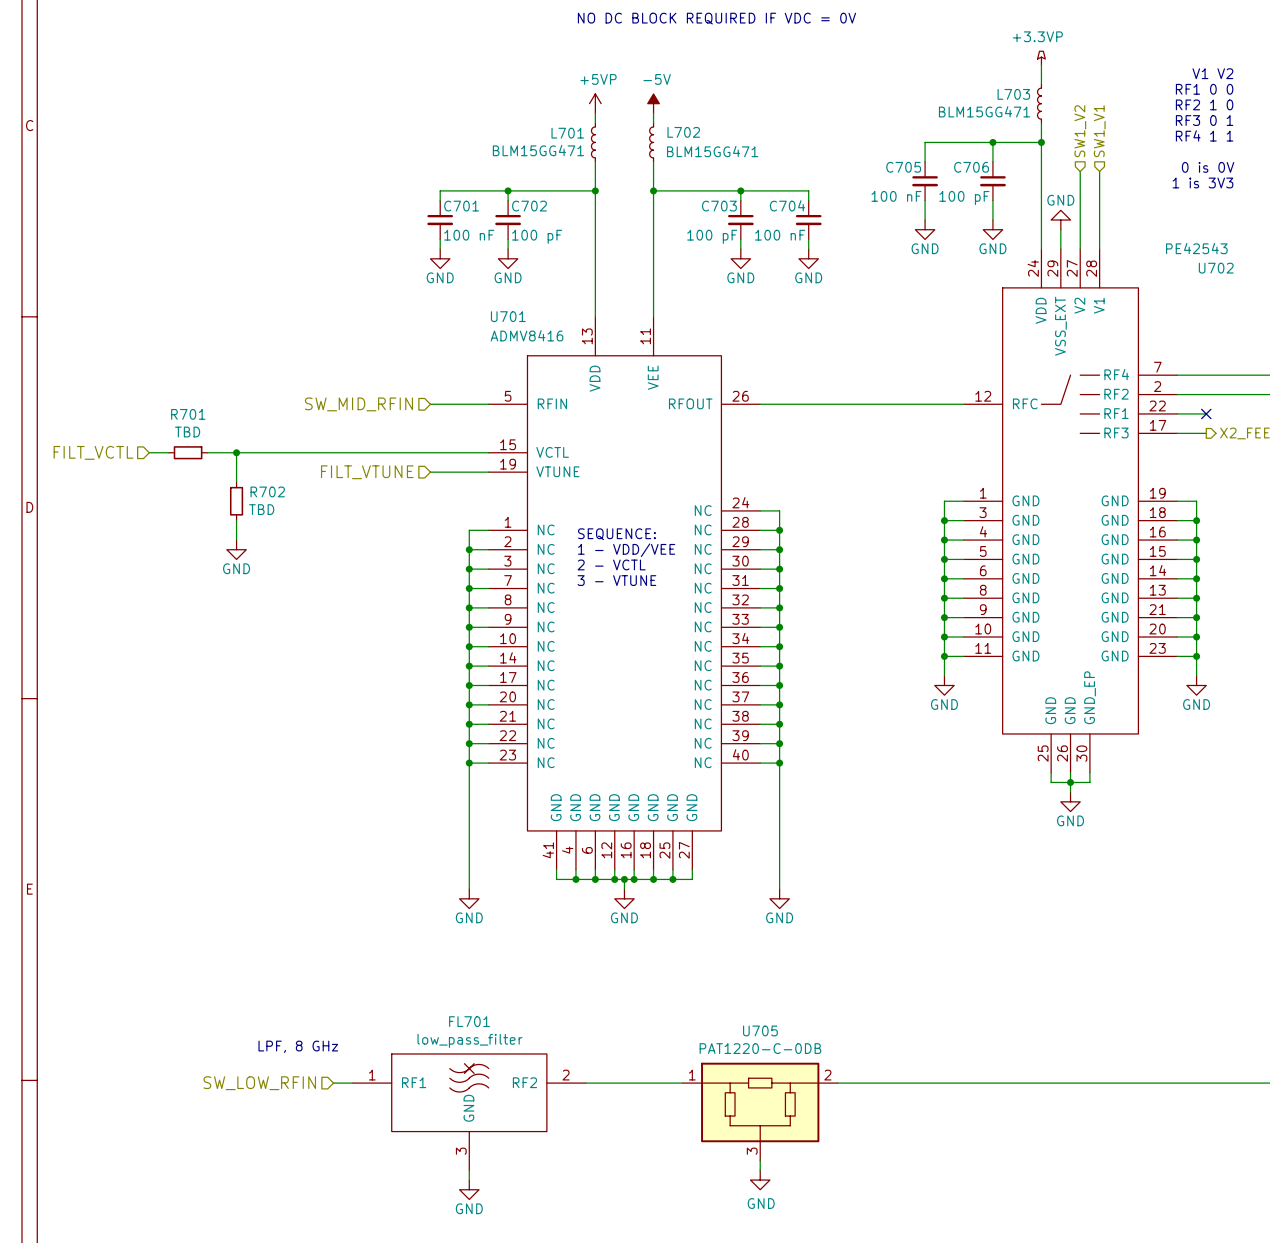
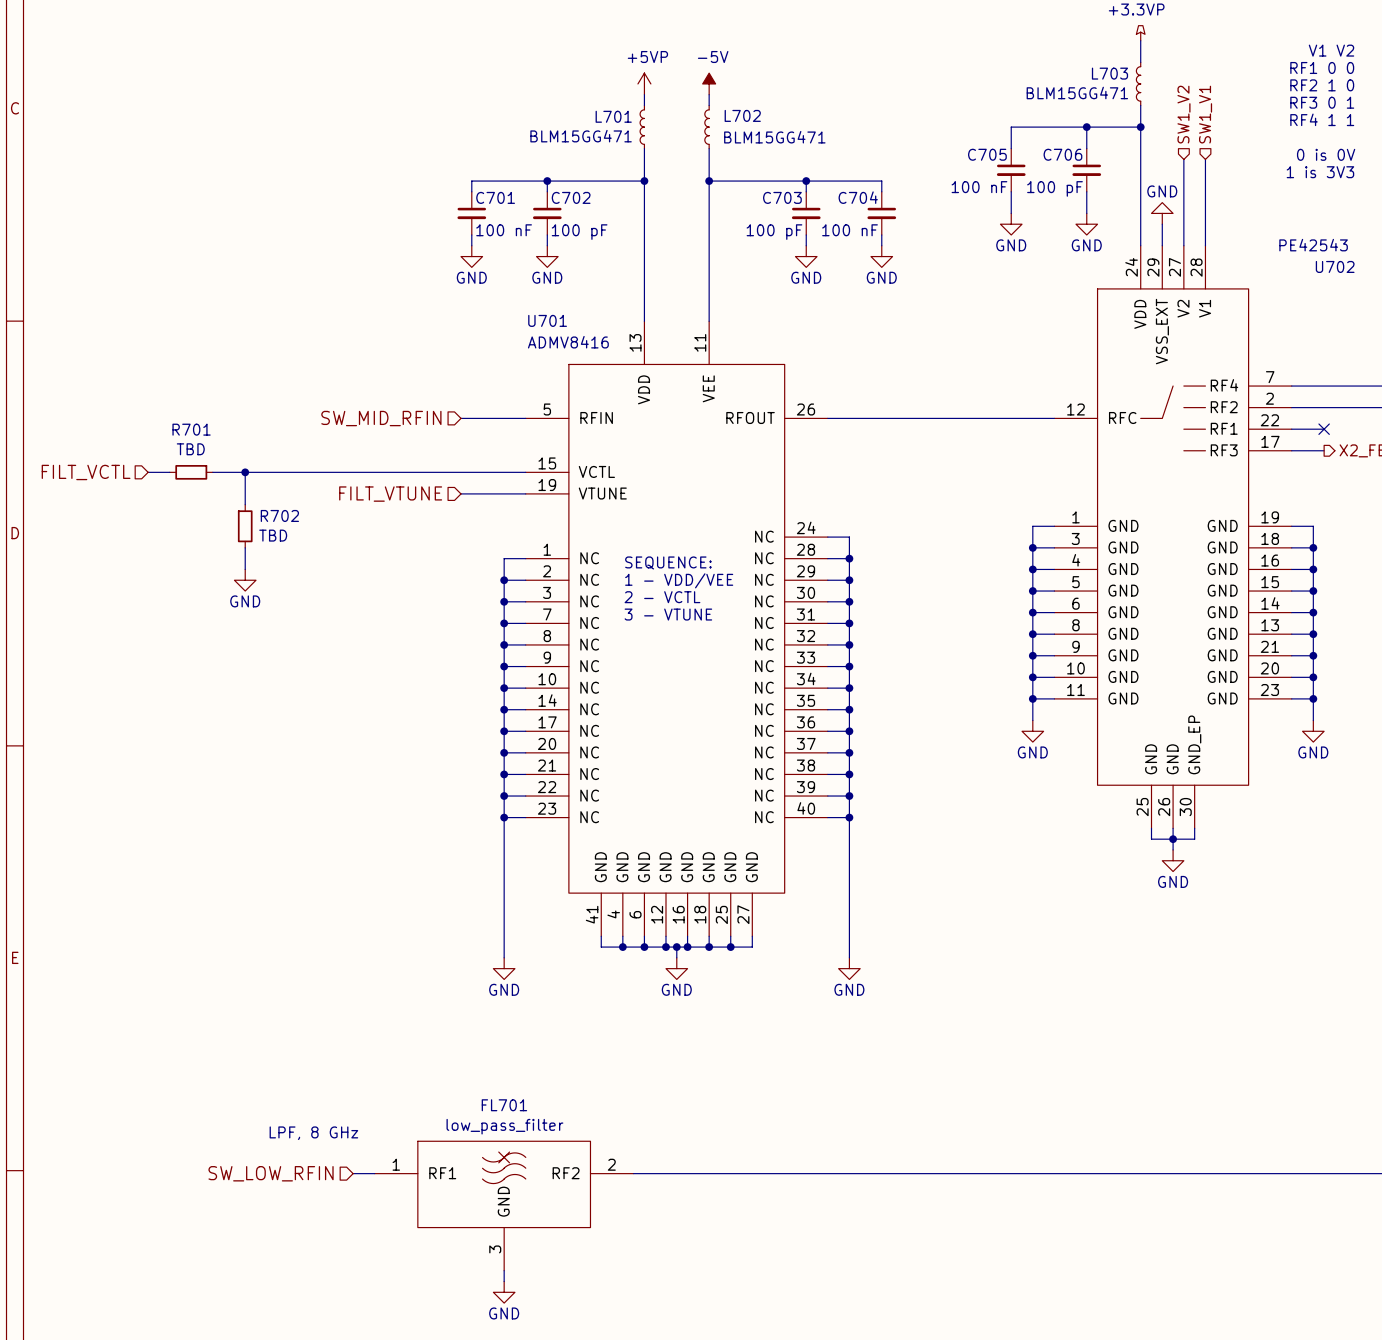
U705: PAT1220-C-0DB (760, 1111) -> none
wire: (760, 1160) (760, 1170) -> none
power symbol: GND (760, 1180) -> none

